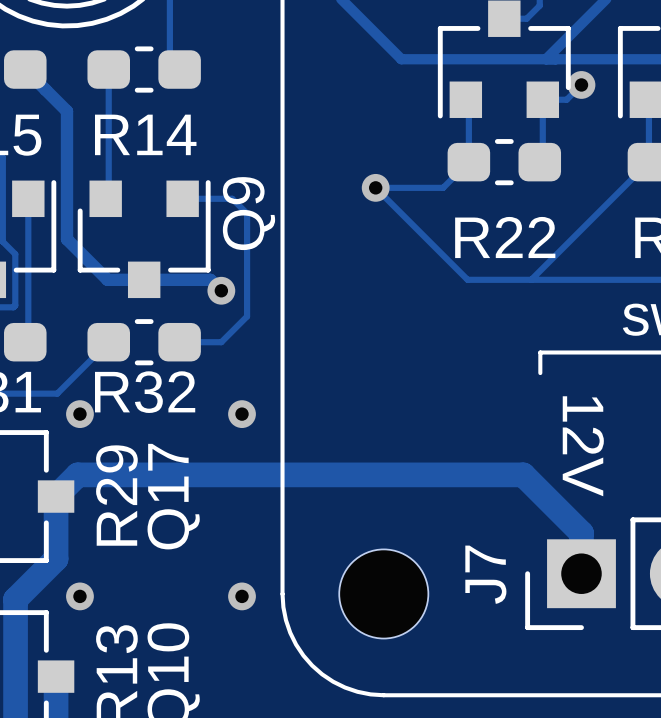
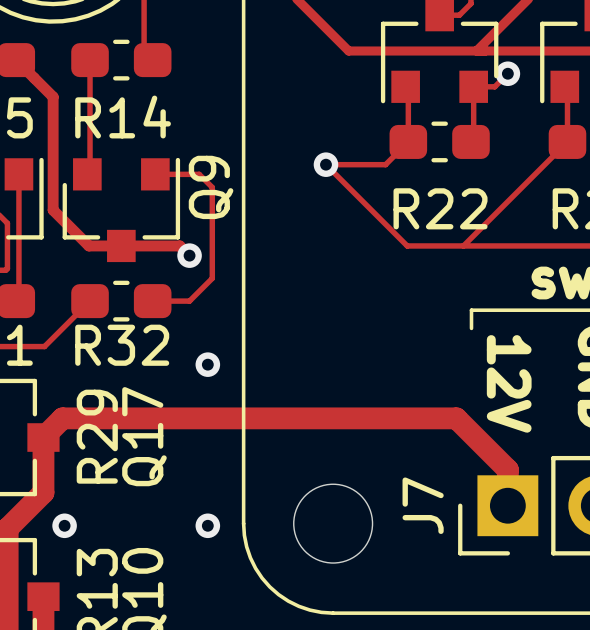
via: (79, 414) -> none

